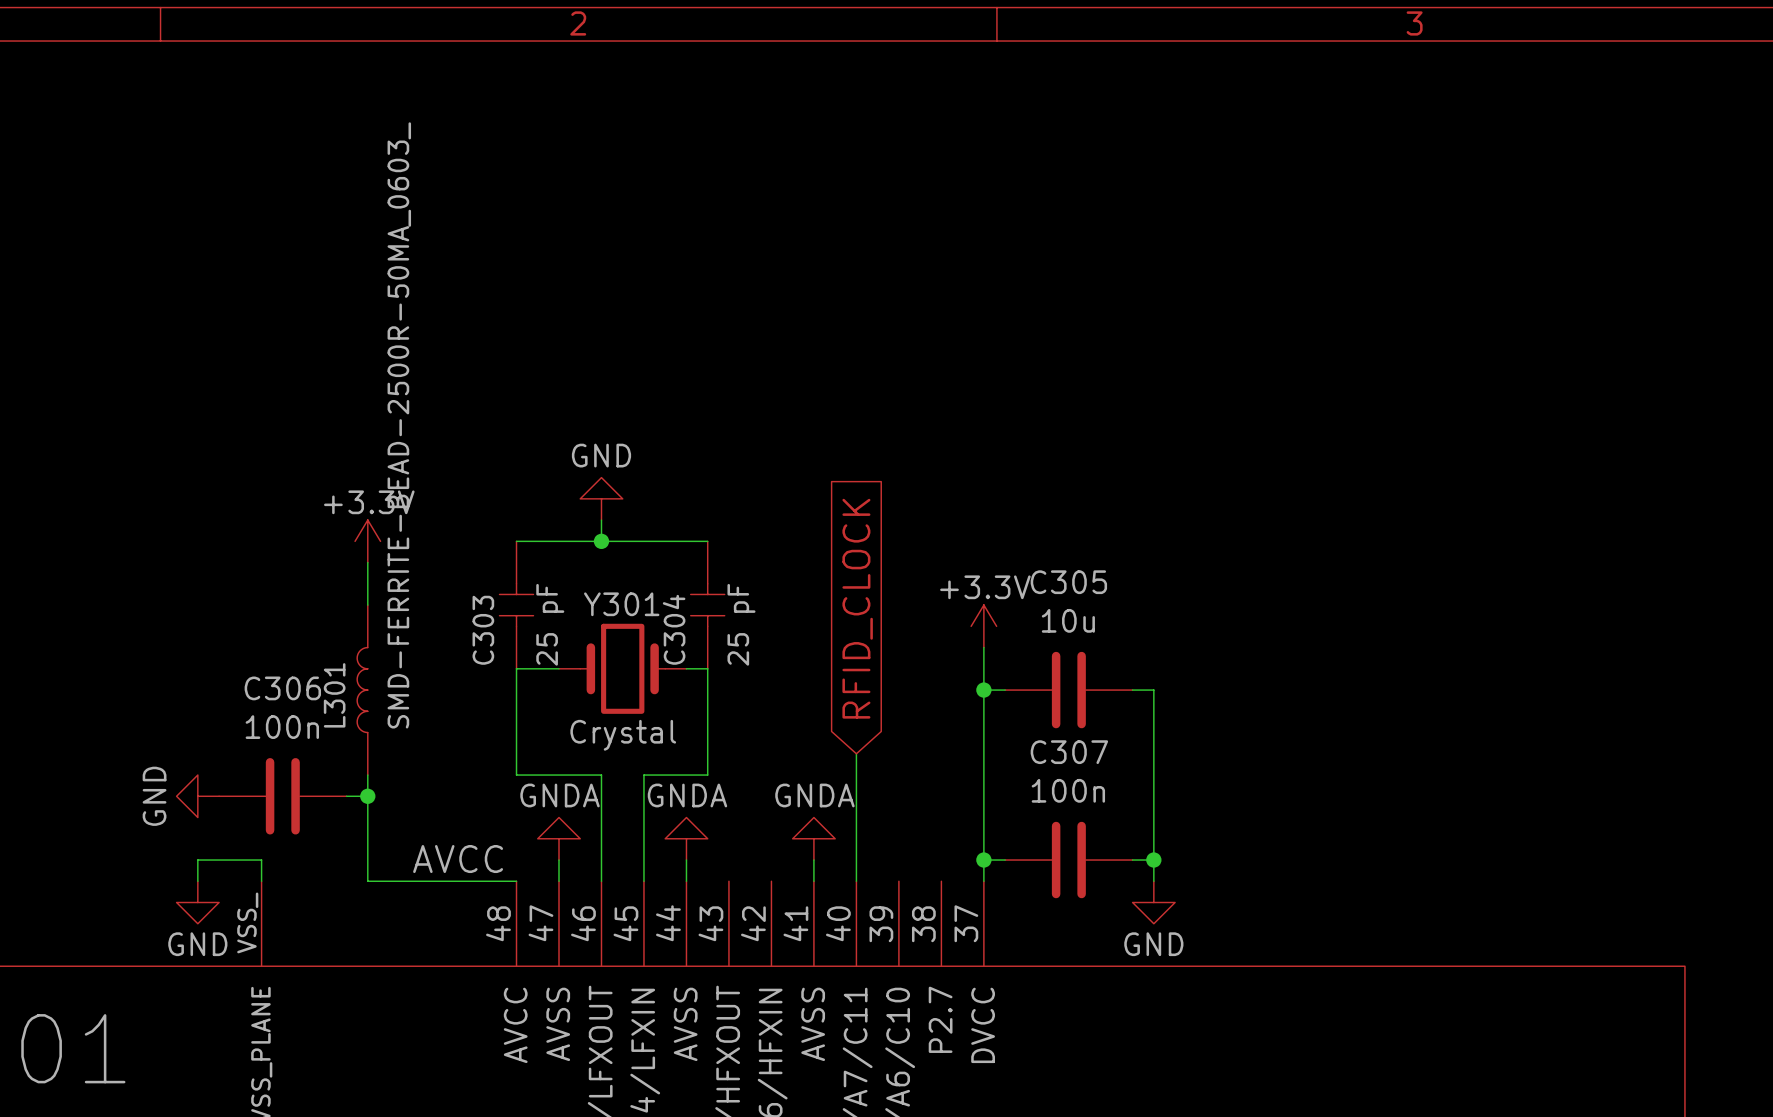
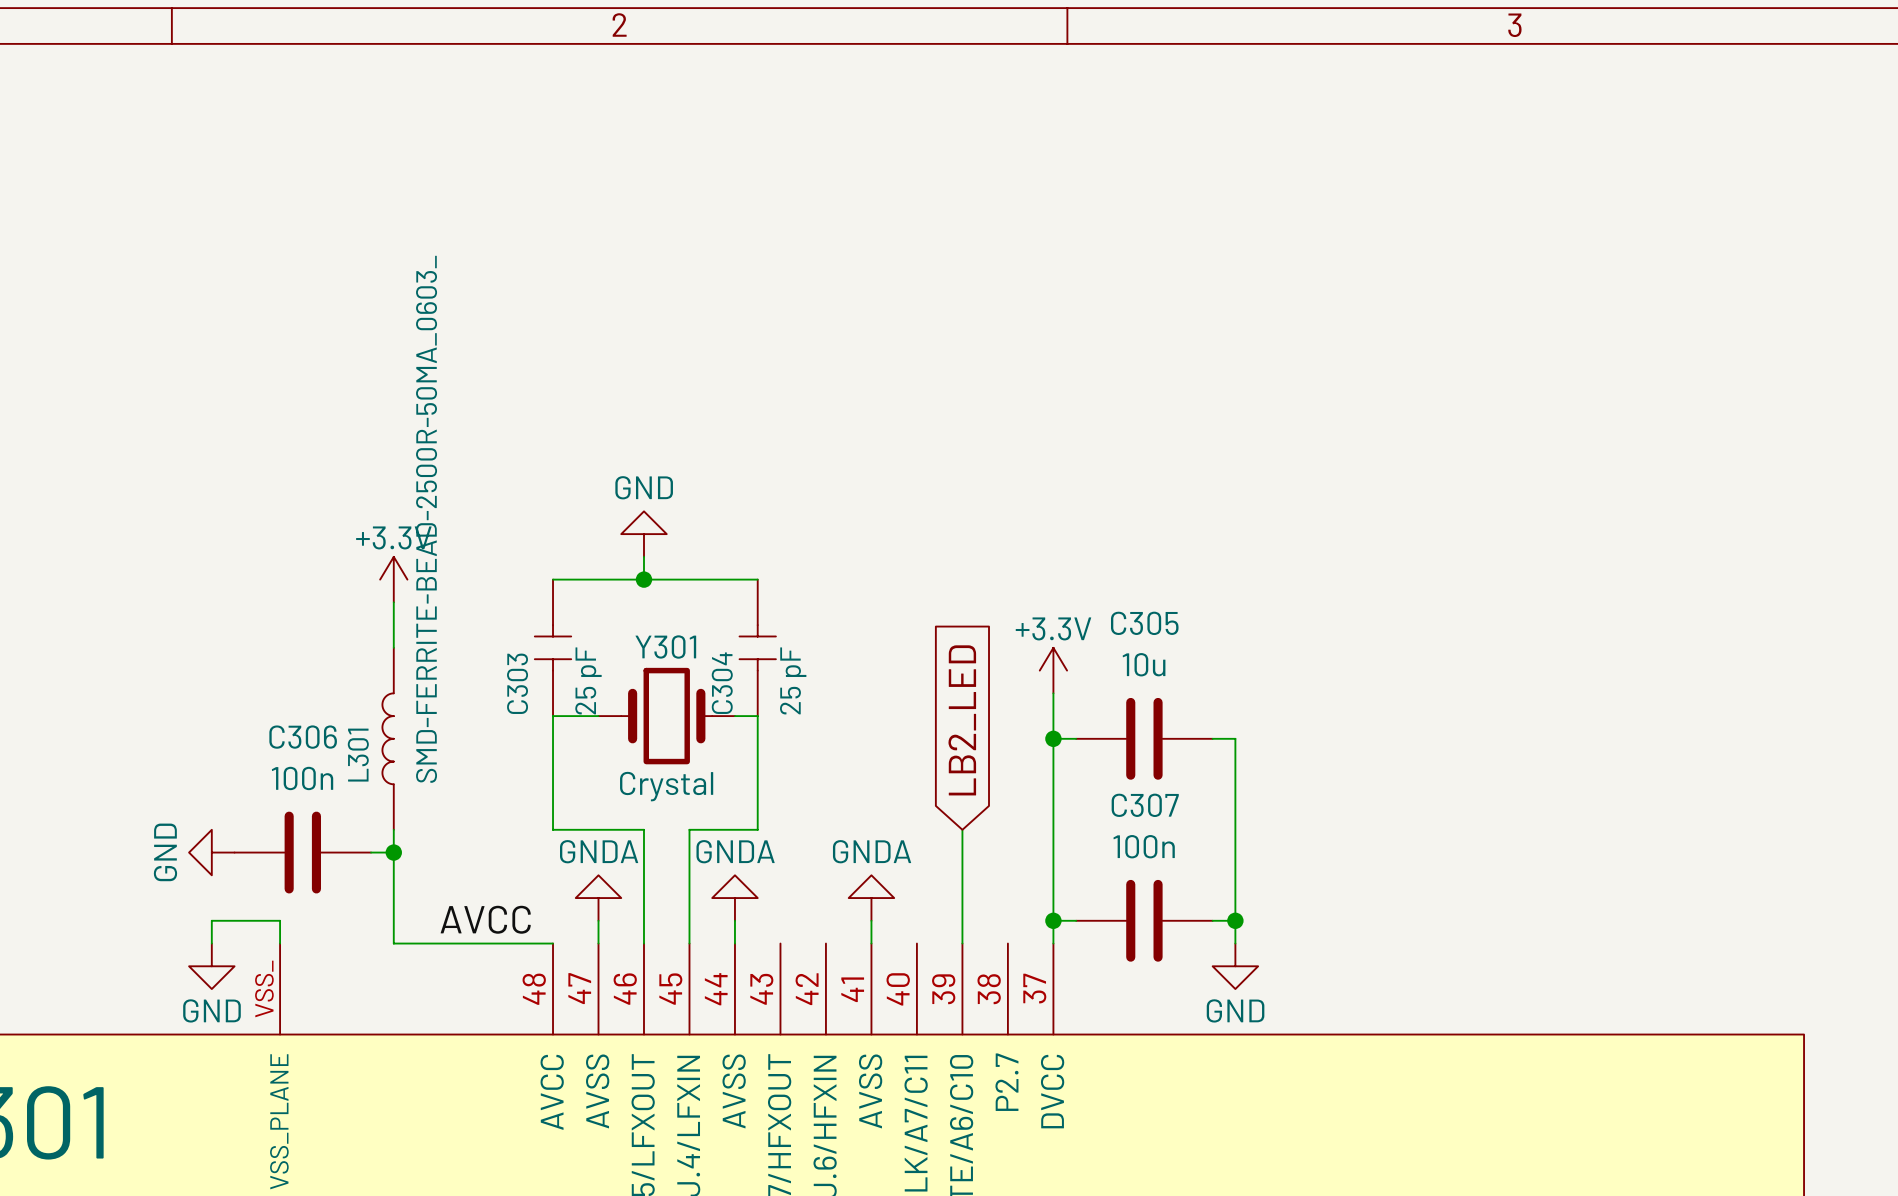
global label: RFID_CLOCK (857, 608) -> none
global label: none -> LB2_LED (962, 720)
wire: (856, 753) (856, 881) -> none
wire: none -> (962, 829) (962, 943)

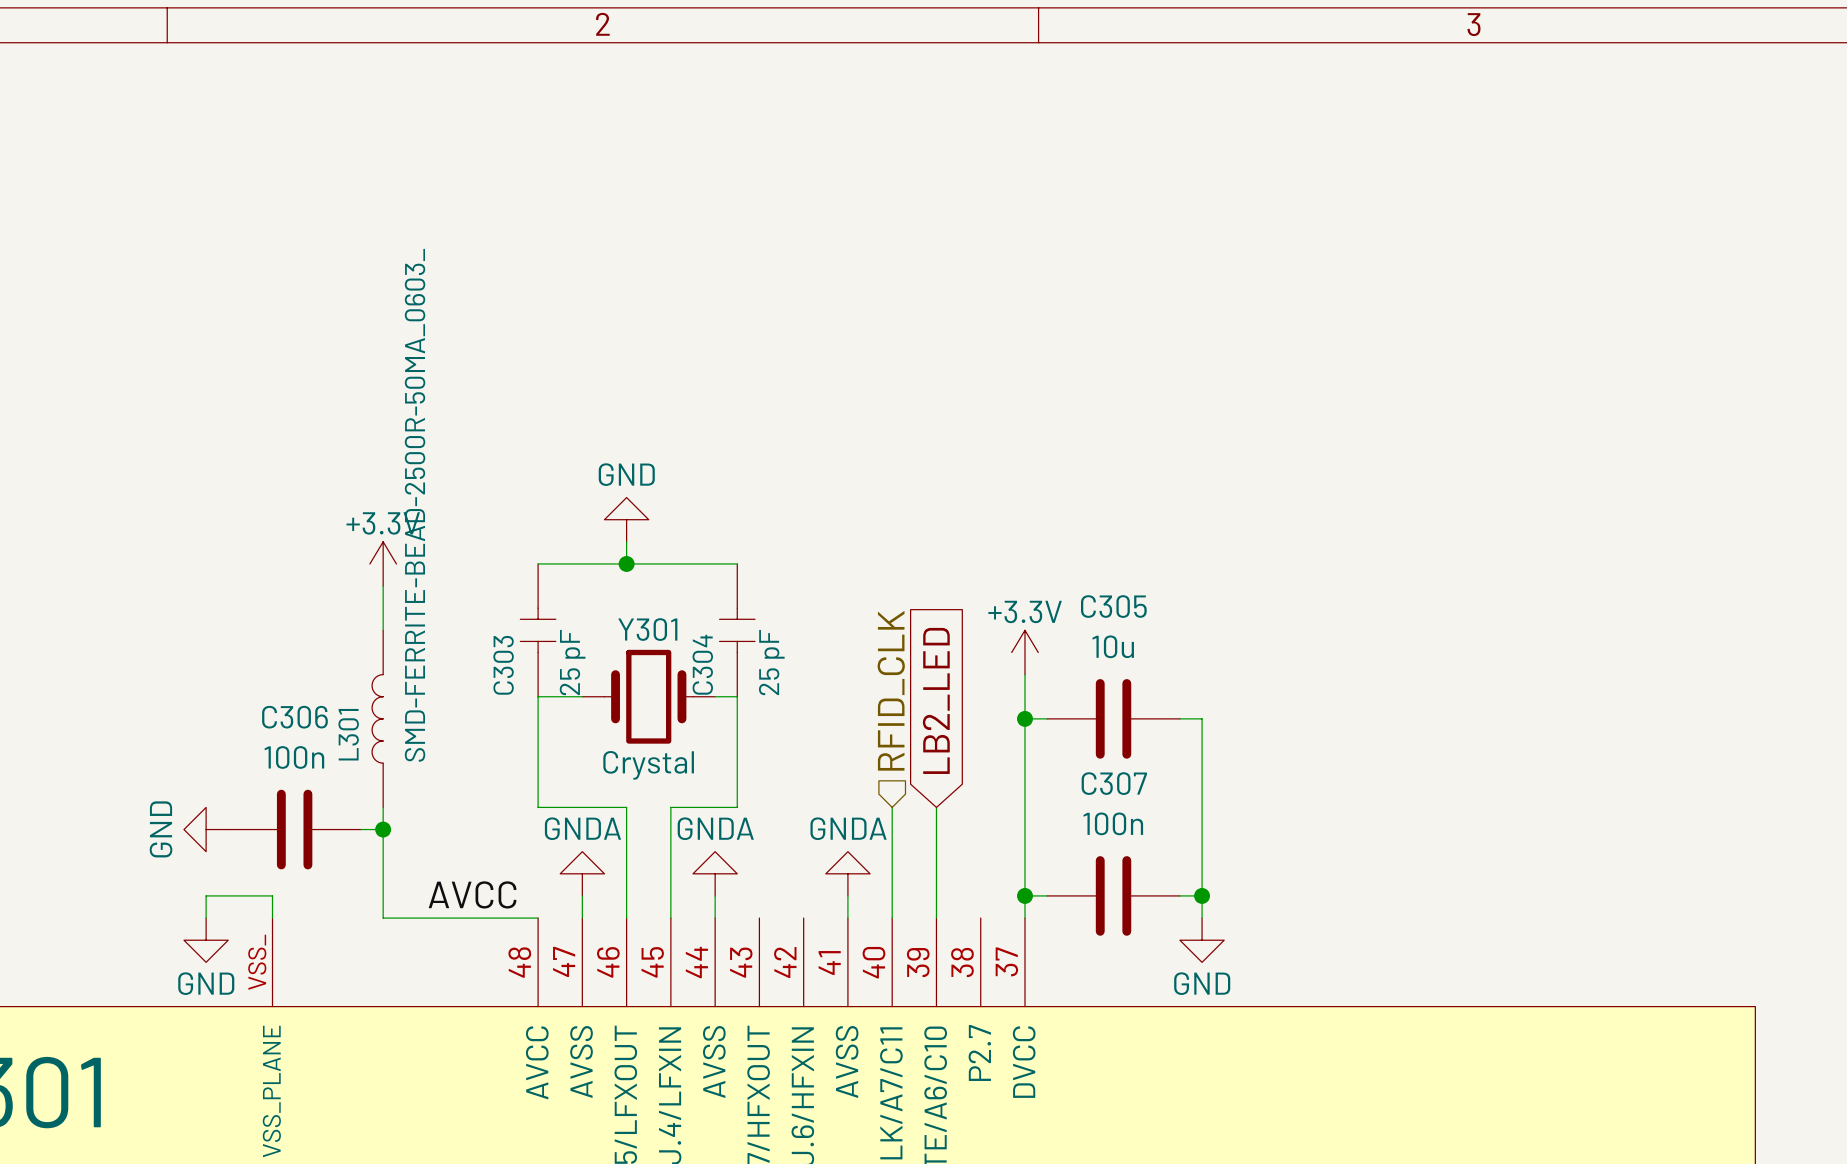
hierarchical label: none -> RFID_CLK (891, 690)
wire: none -> (892, 807) (892, 918)

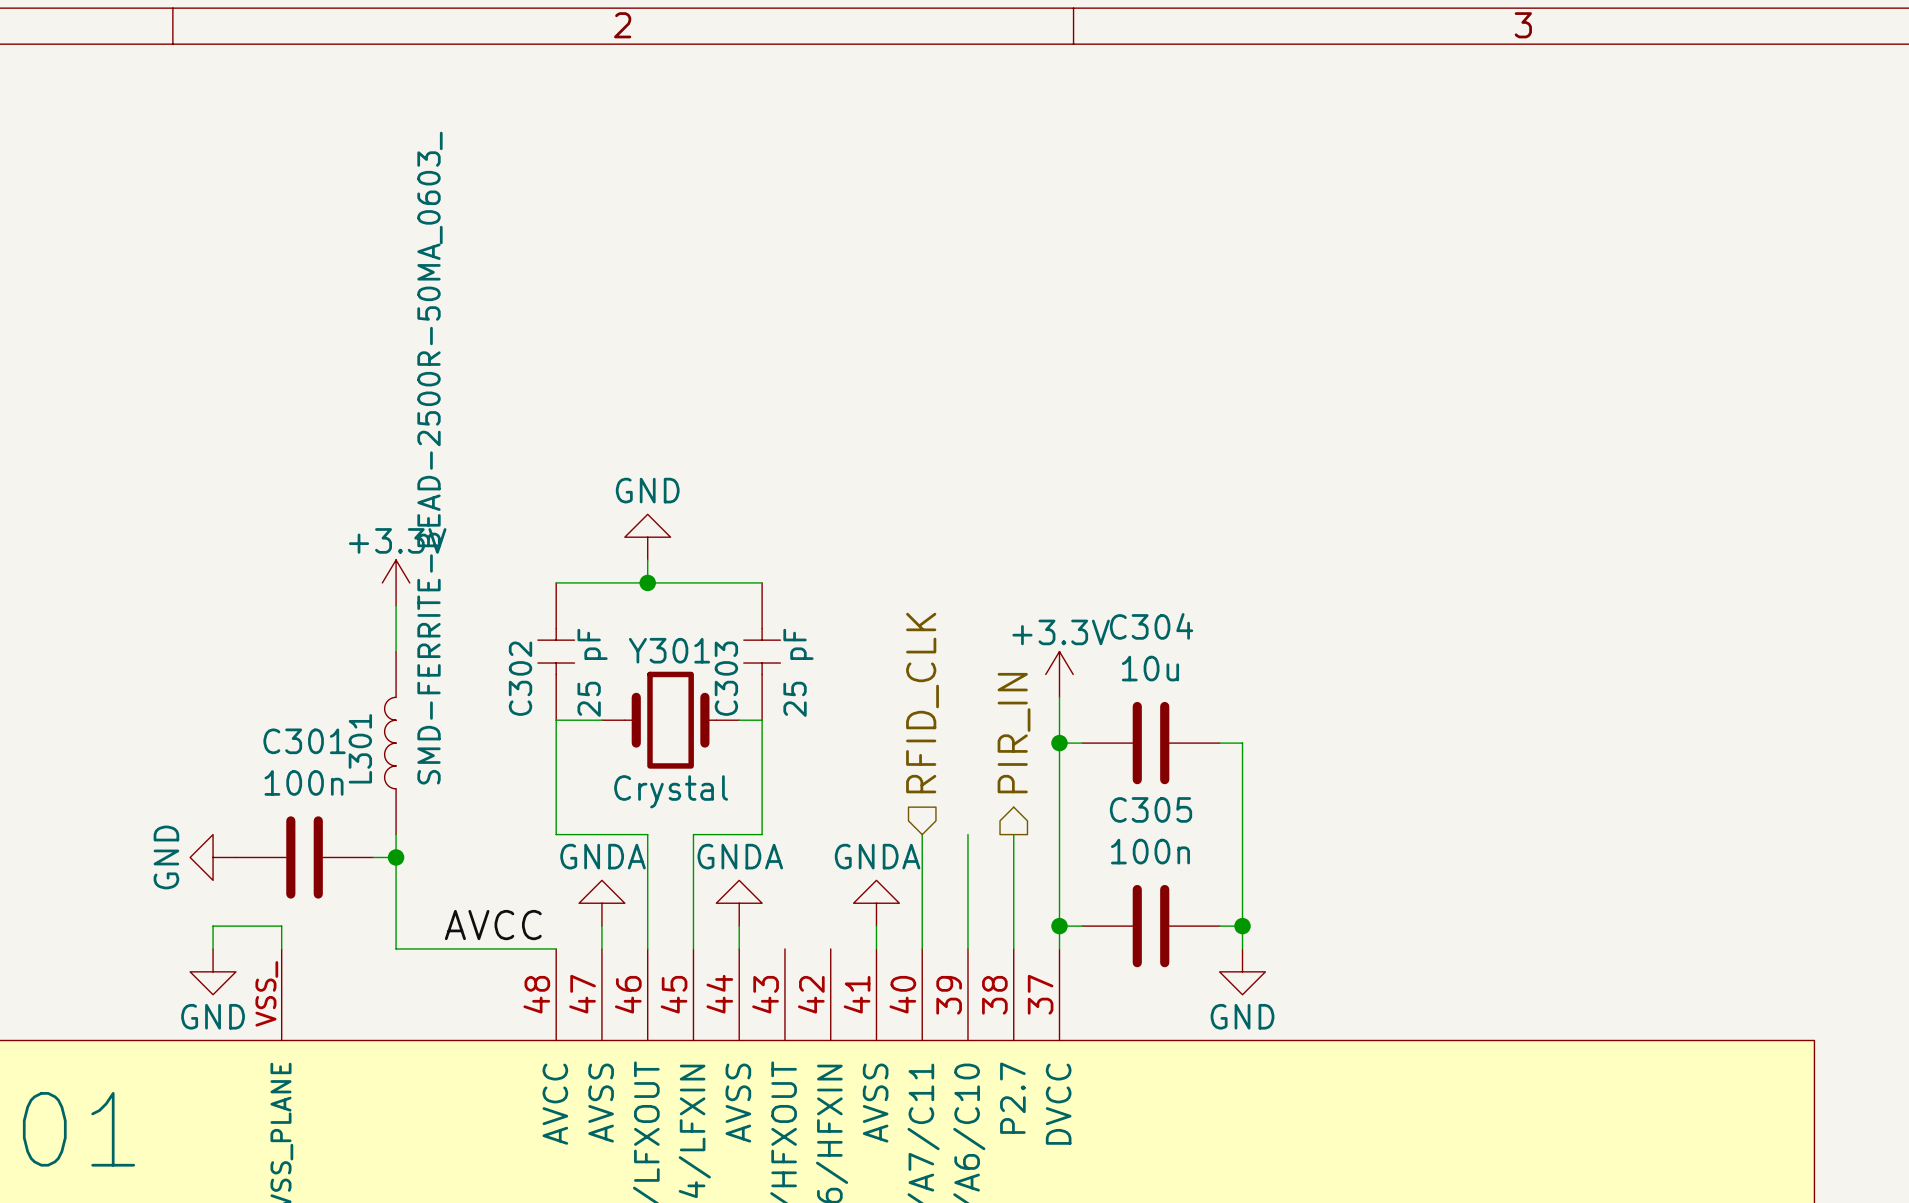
C305 name: C305 (1113, 606) -> C304 (1151, 626)
C304 name: C304 (702, 664) -> C303 (726, 678)
C303 name: C303 (503, 665) -> C302 (520, 678)
global label: LB2_LED (936, 700) -> none
C306 name: C306 (294, 717) -> C301 (304, 741)
hierarchical label: none -> PIR_IN (1014, 733)
C307 name: C307 (1114, 783) -> C305 (1151, 809)
wire: none -> (1013, 834) (1013, 948)

